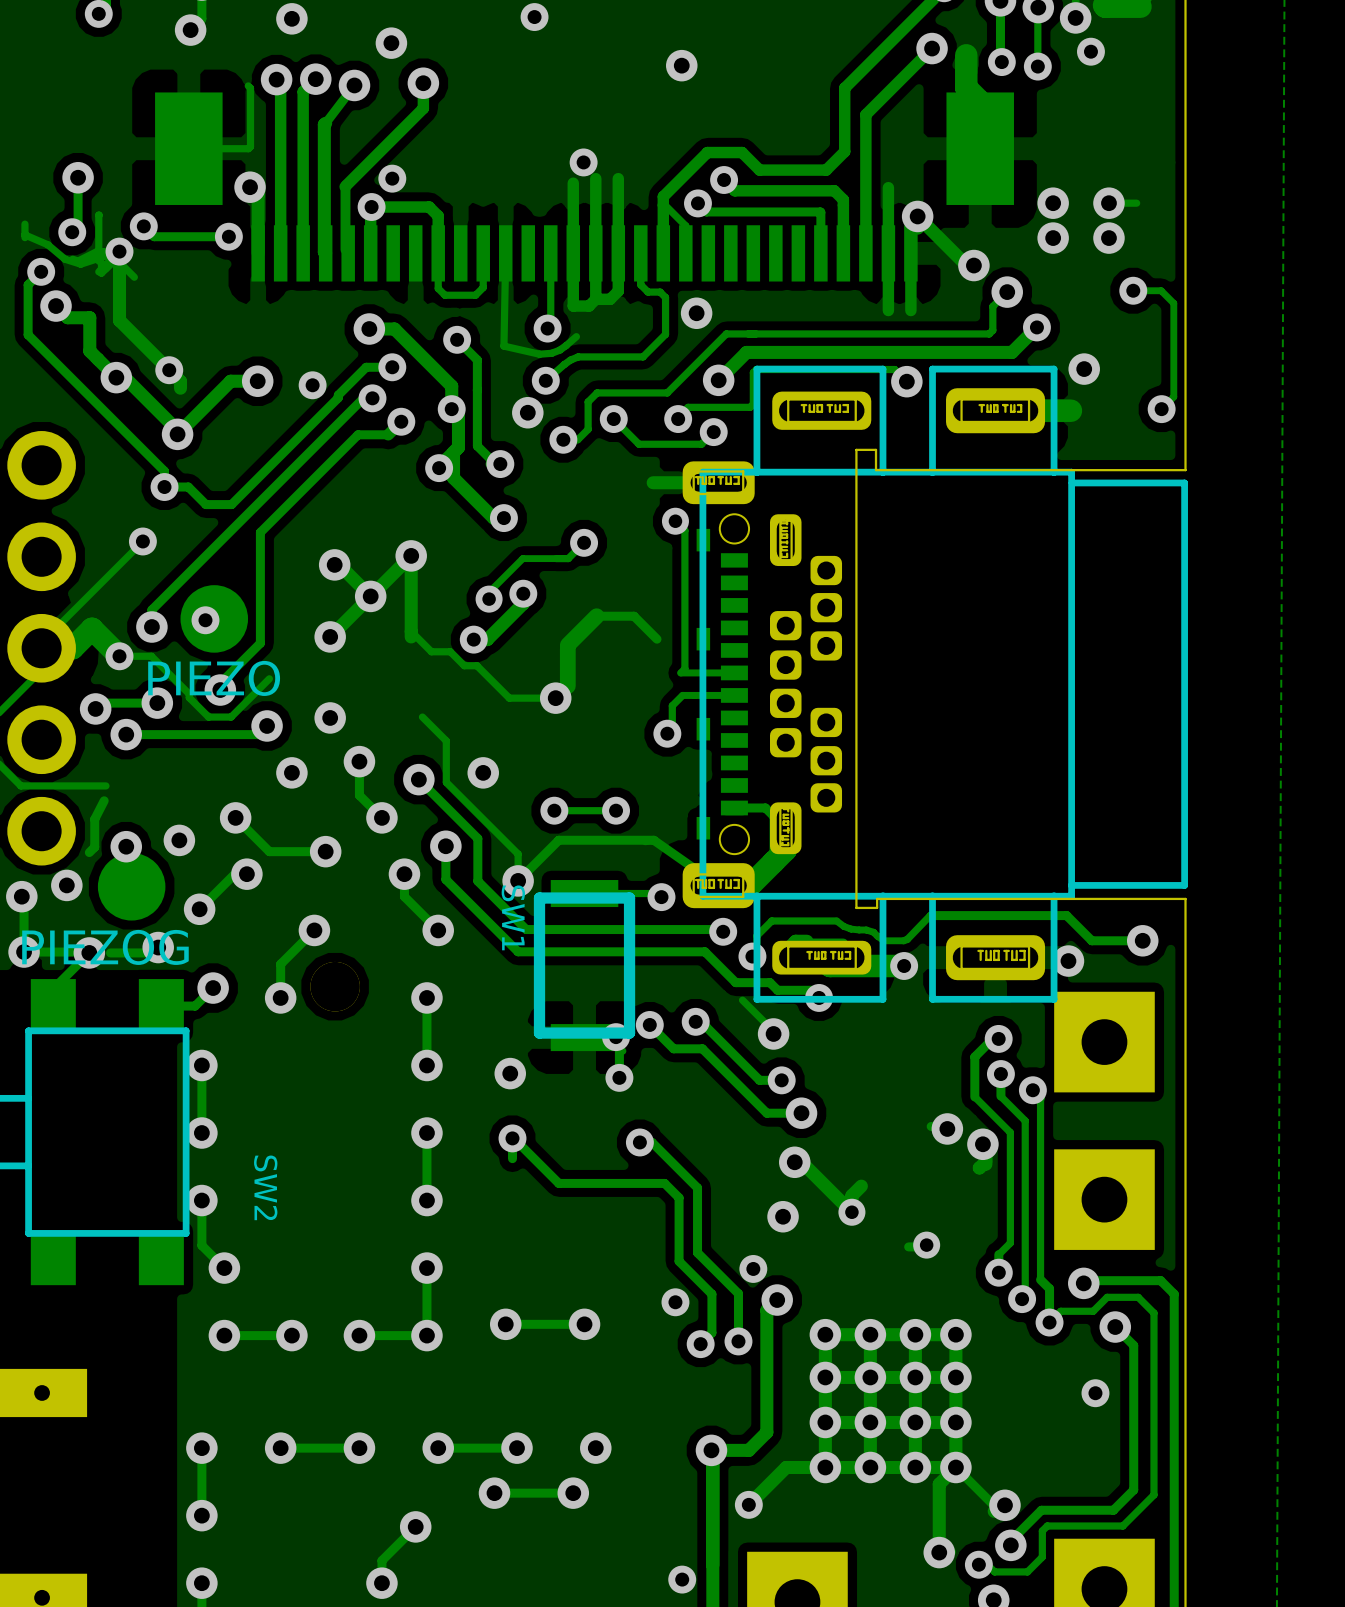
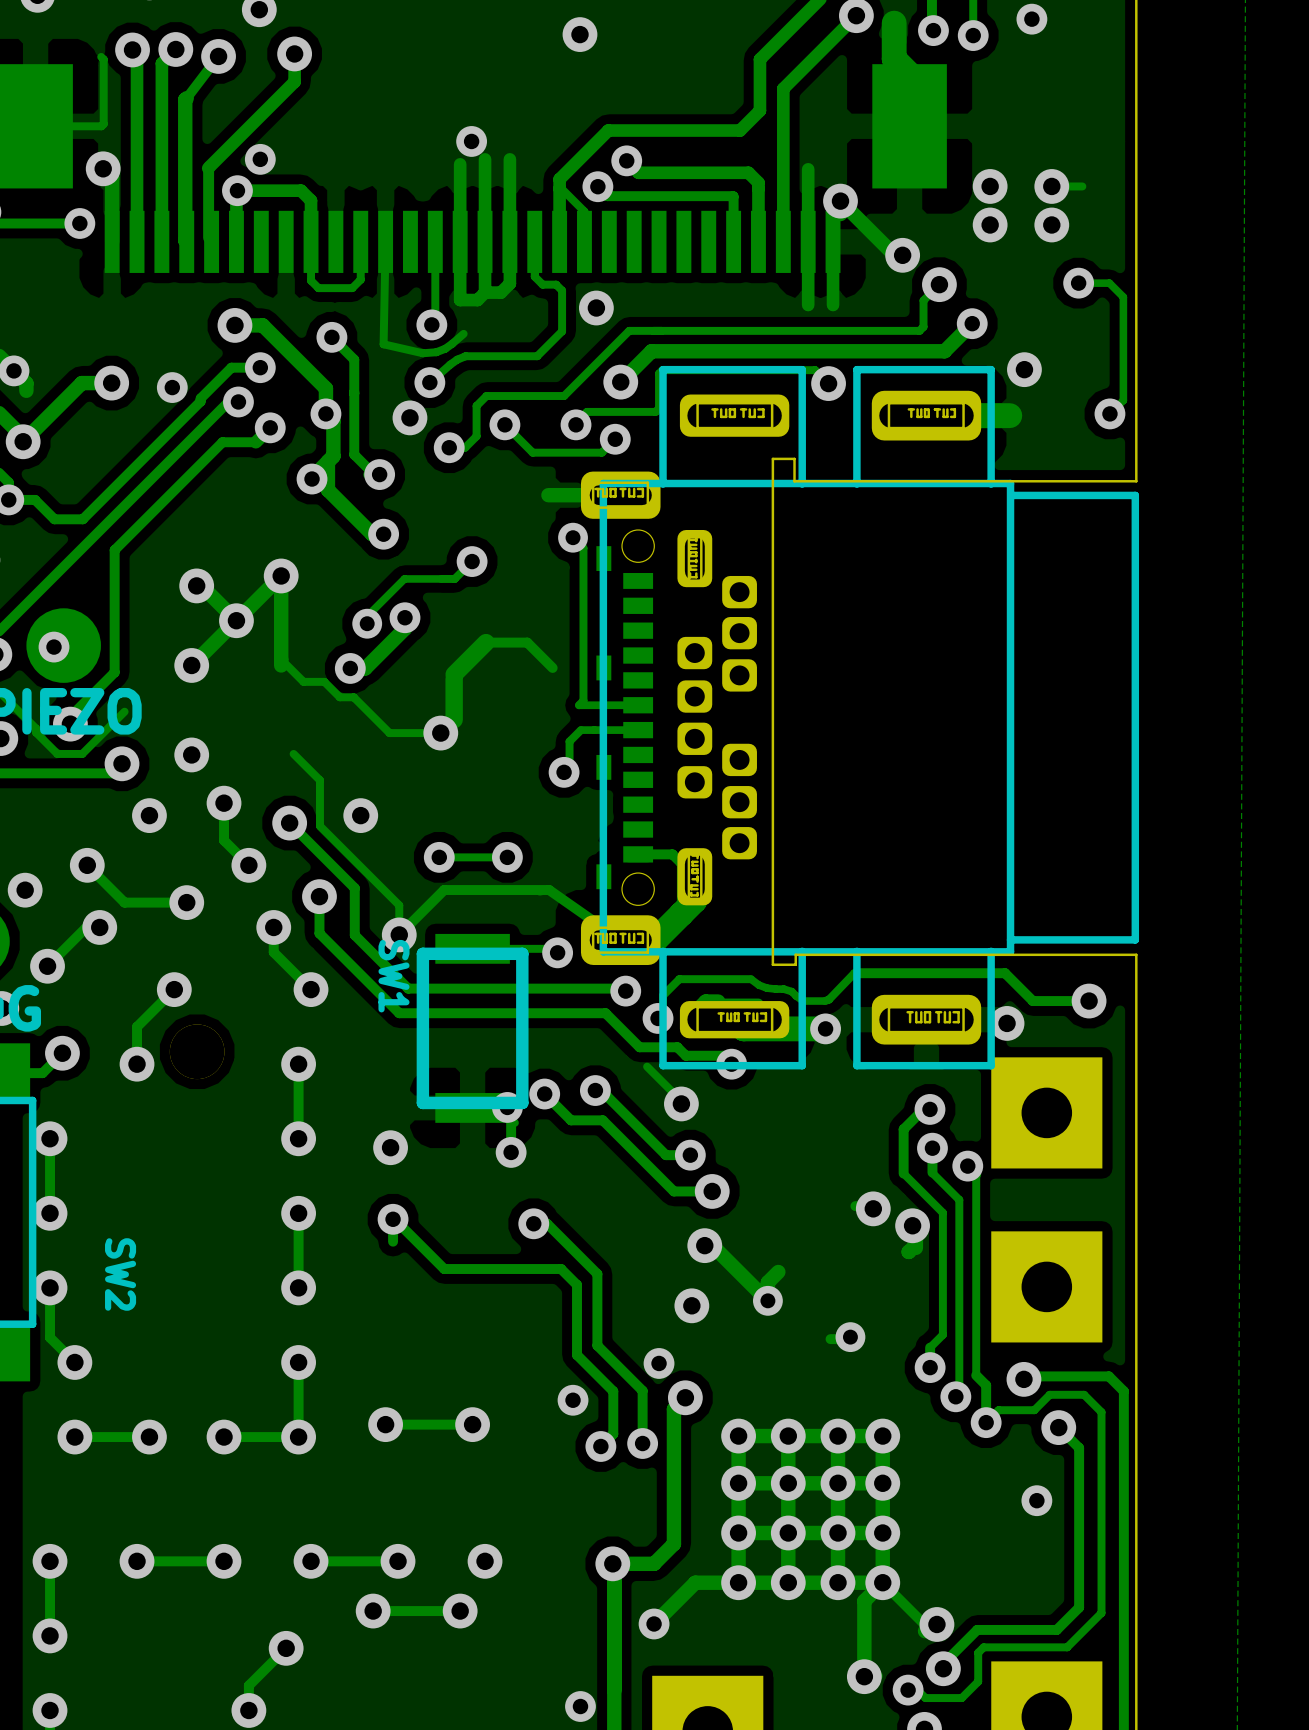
track: (844, 134) (844, 151) (826, 170) (759, 170) (742, 152) -> (759, 110) (740, 130) (646, 130)

